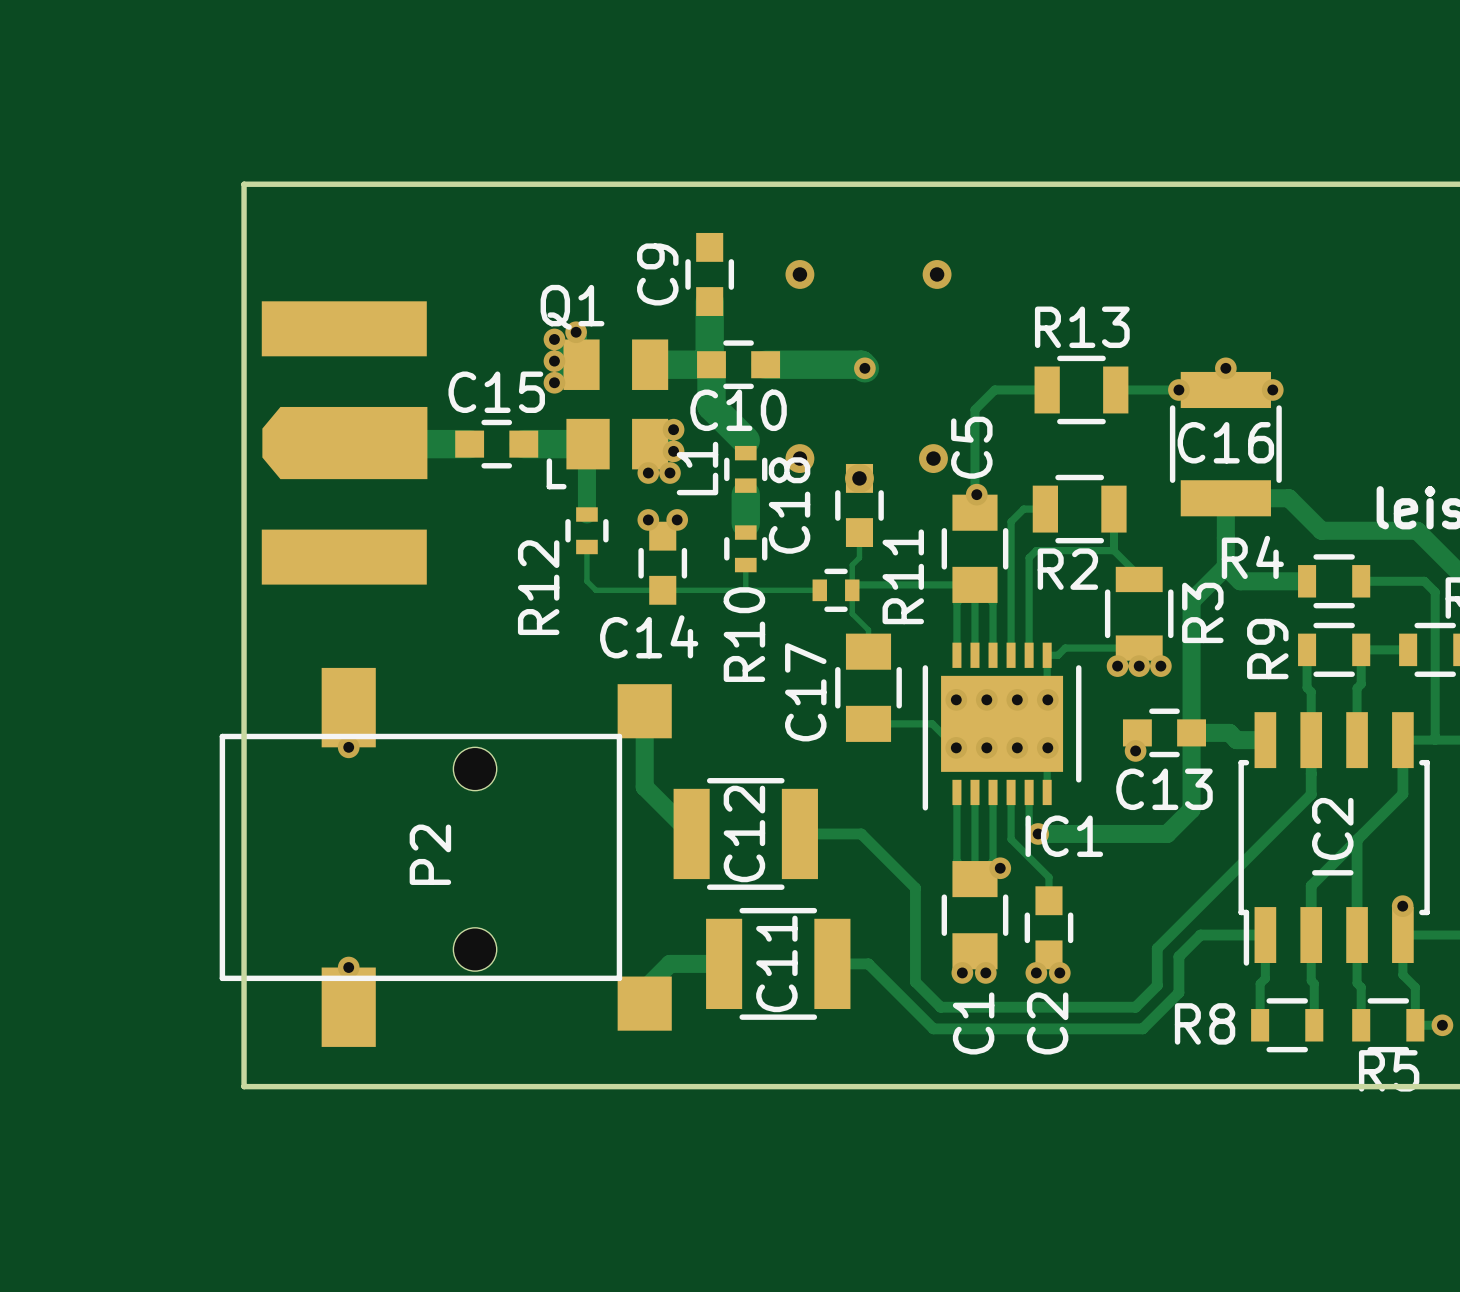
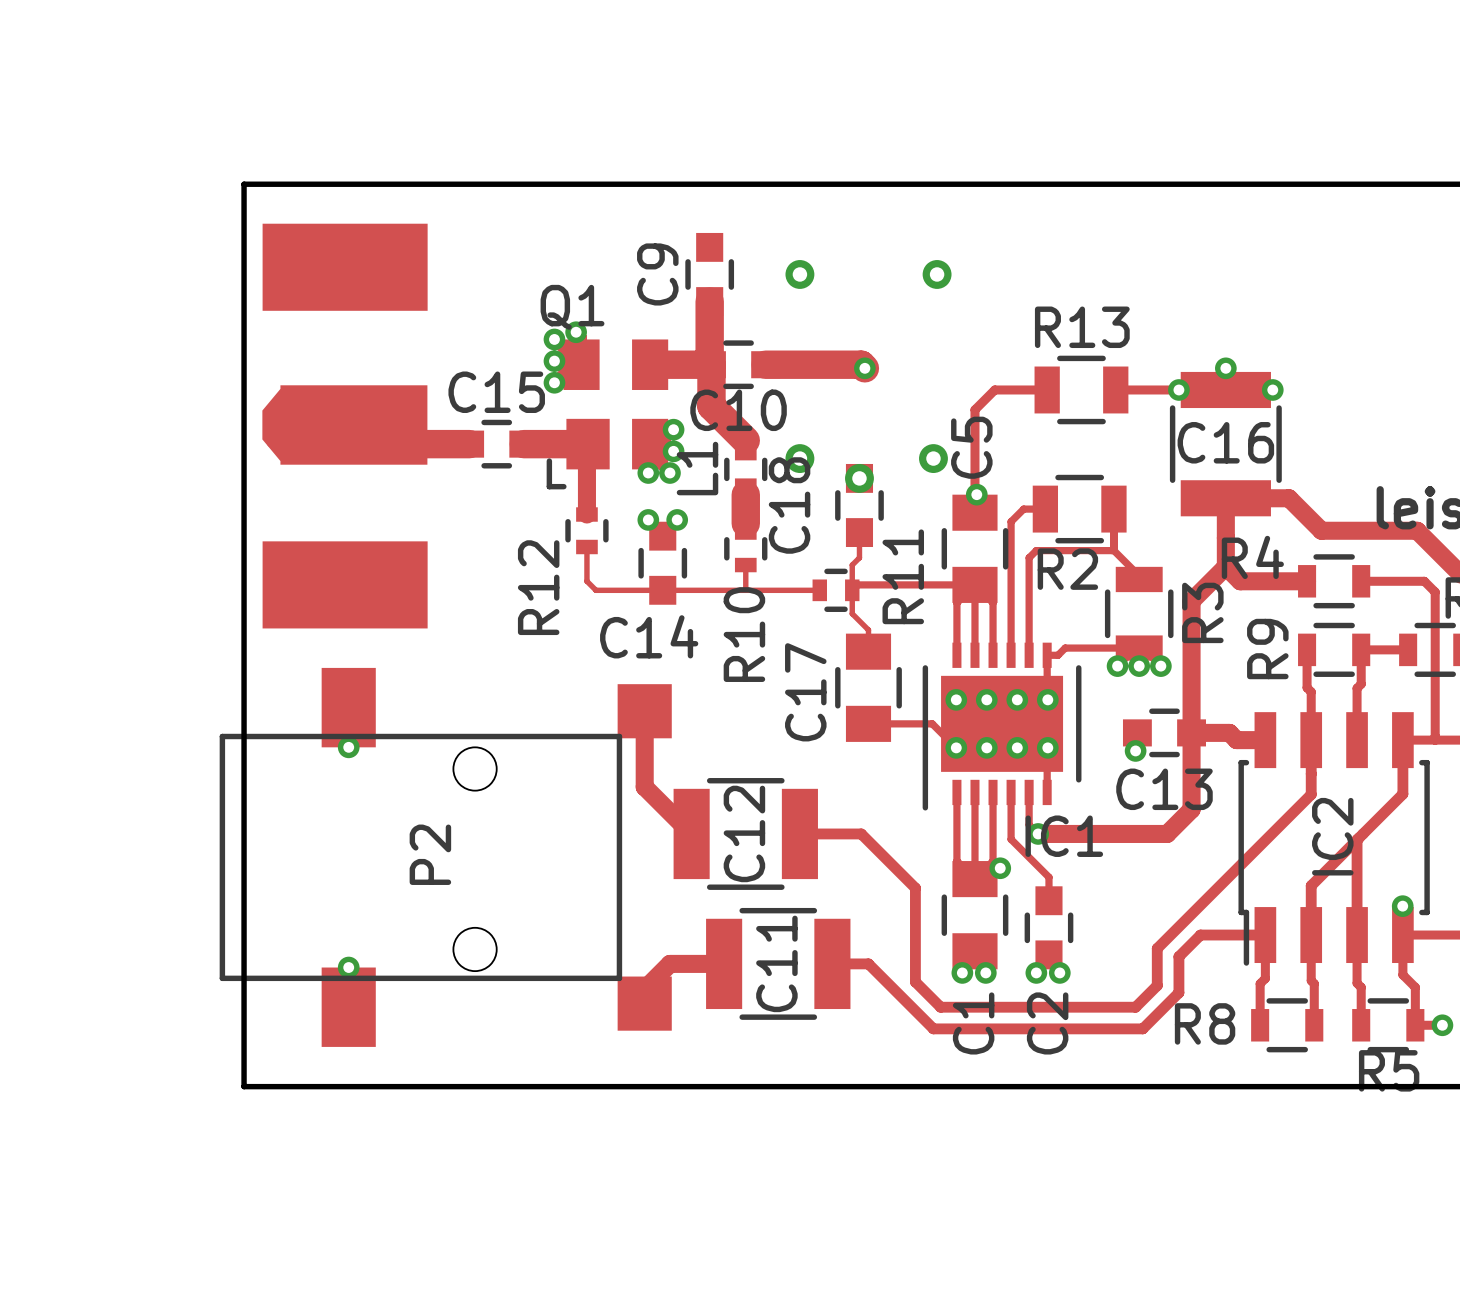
part footprint: [261, 301, 428, 585] -> [262, 223, 428, 629]

